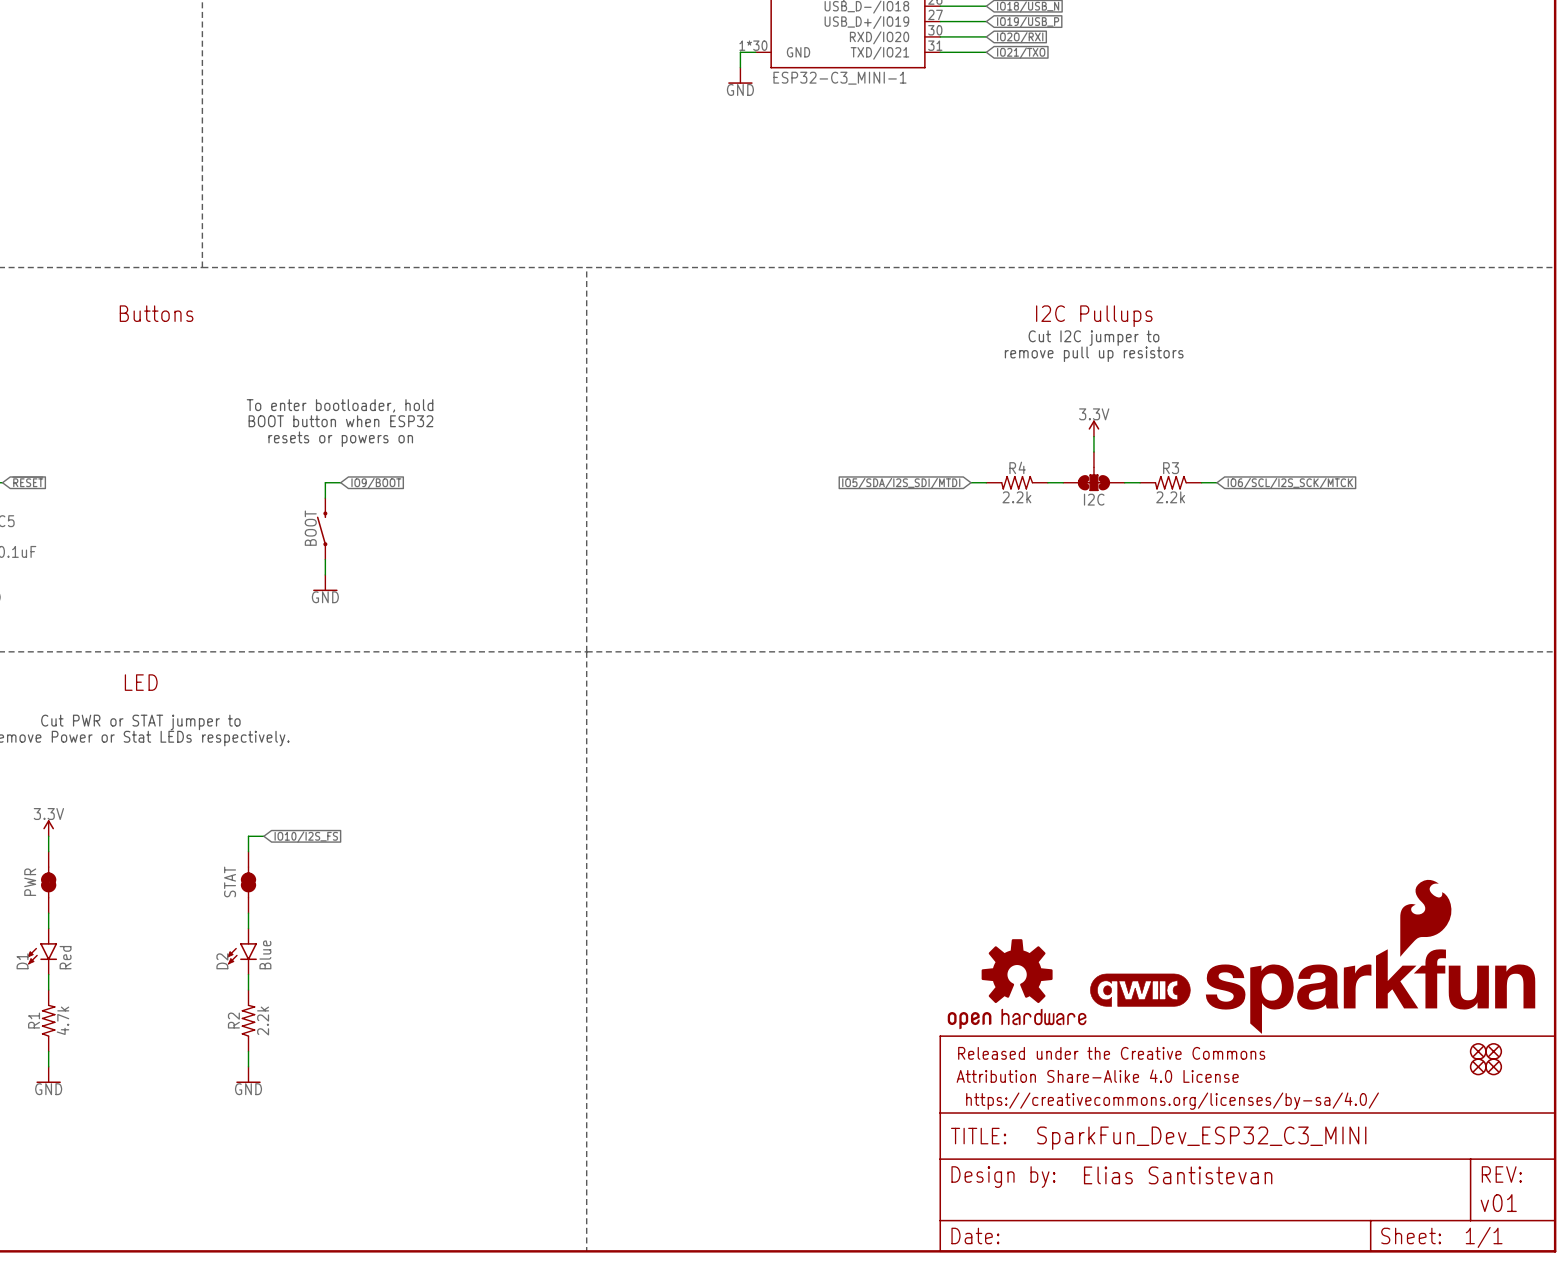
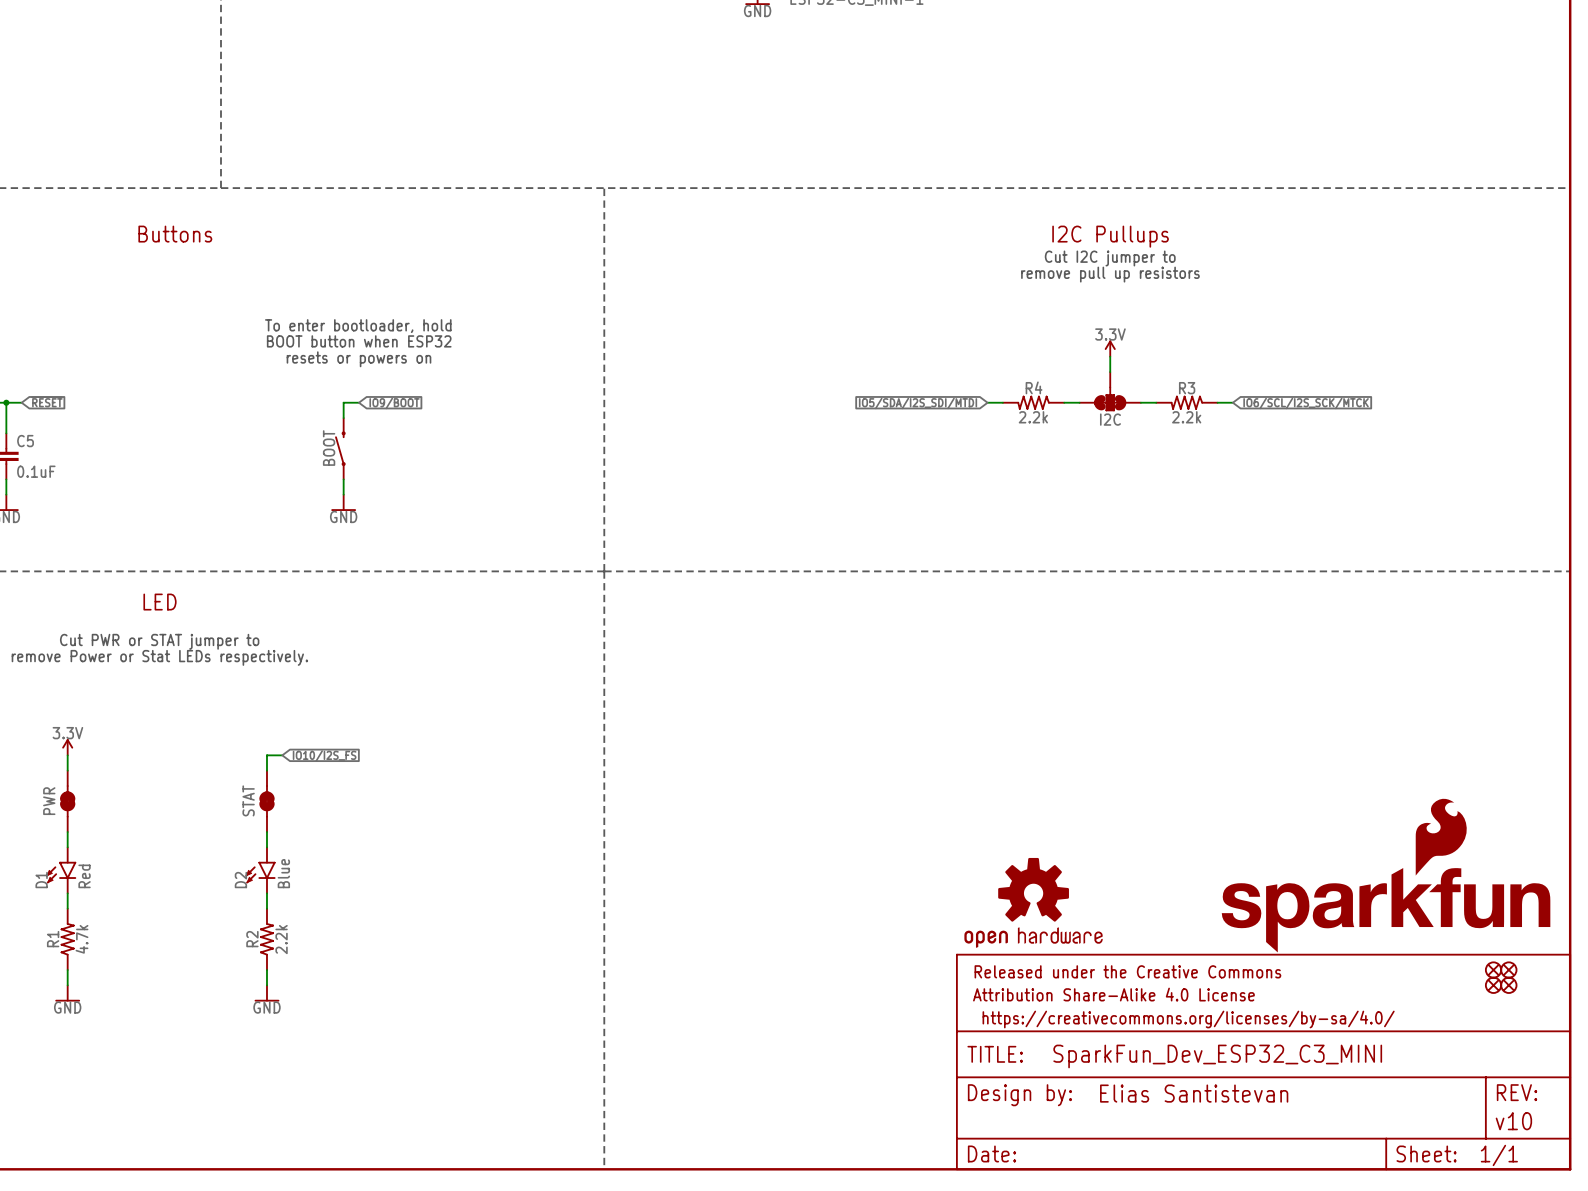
part: (1140, 990) -> none
part text: v01 (1498, 1203) -> v10 (1513, 1121)

